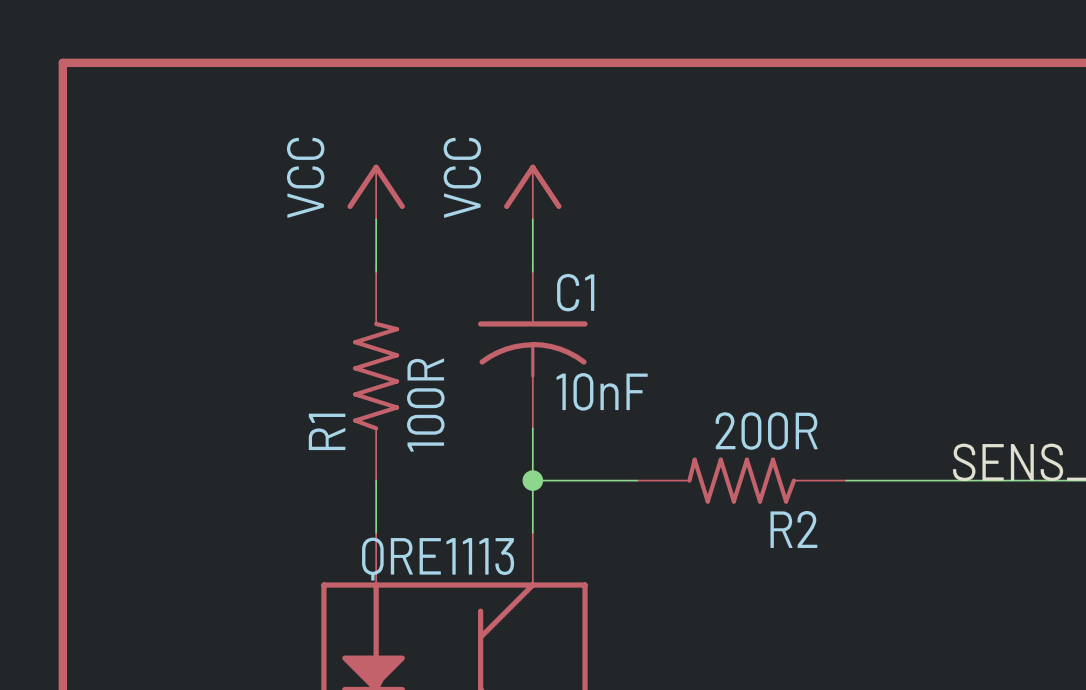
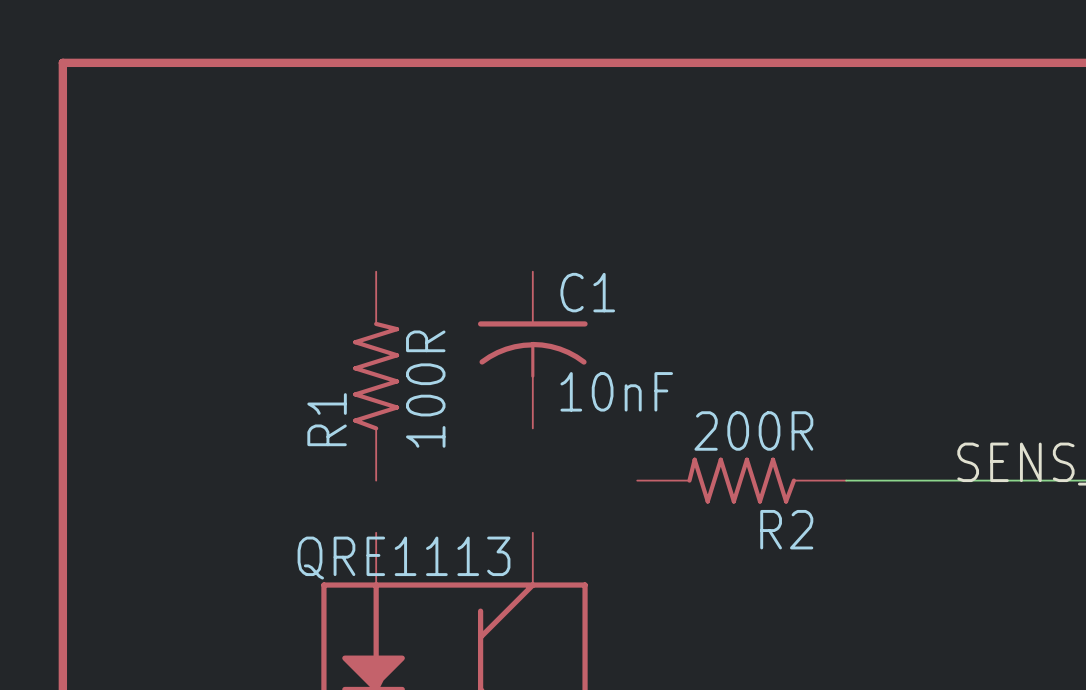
power symbol: VCC (376, 192) -> none
power symbol: VCC (532, 192) -> none
wire: (376, 219) (376, 271) -> none
wire: (532, 219) (532, 271) -> none
wire: (532, 428) (532, 532) -> none
wire: (376, 480) (376, 532) -> none
wire: (532, 480) (637, 480) -> none
junction: (532, 480) -> none

